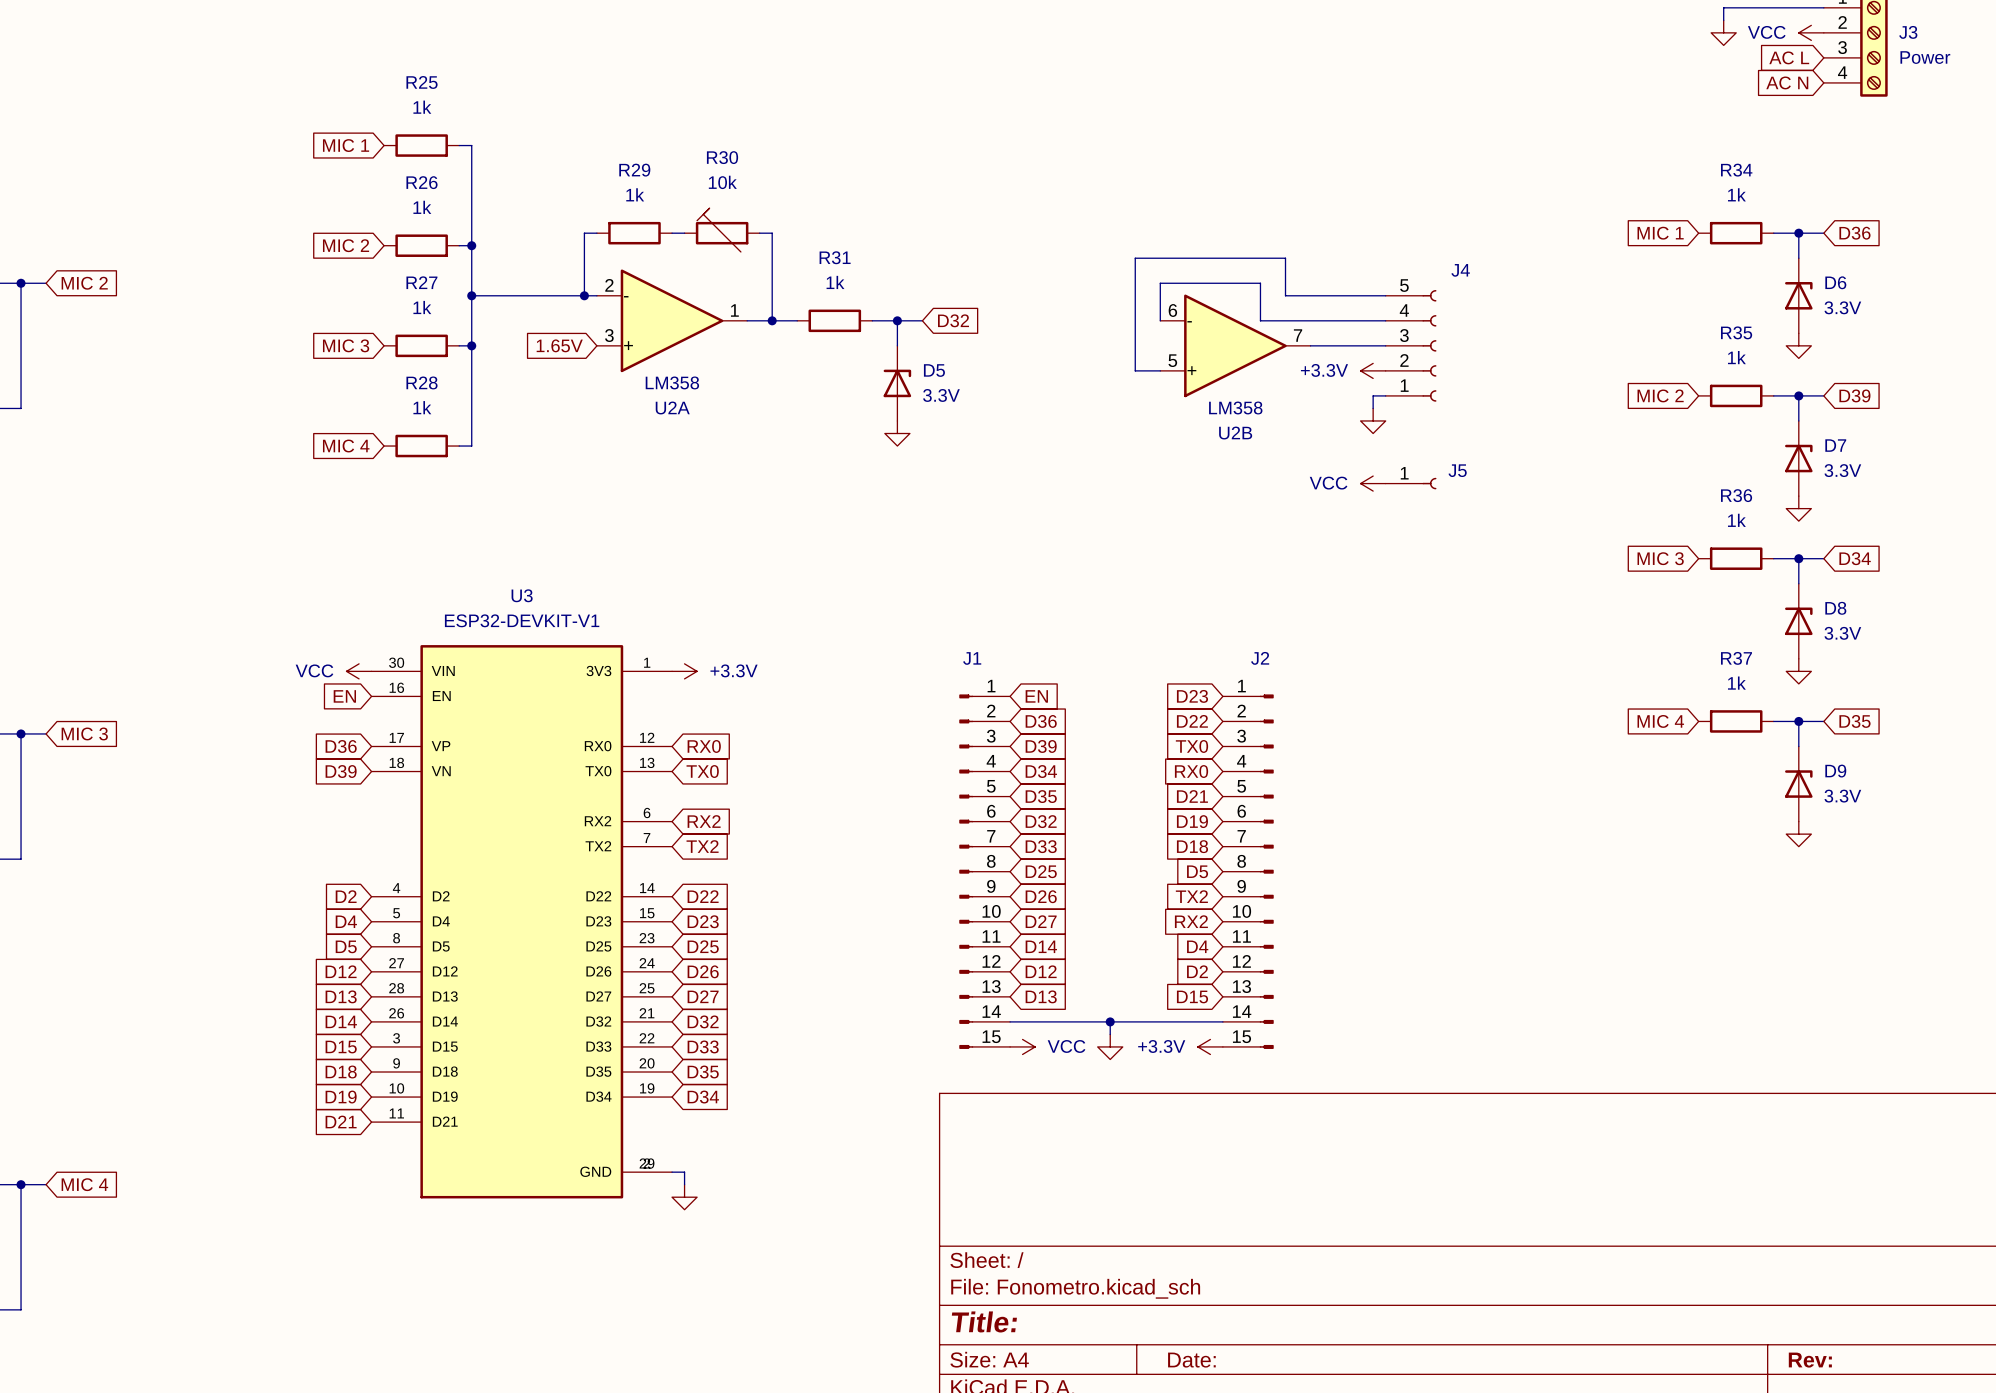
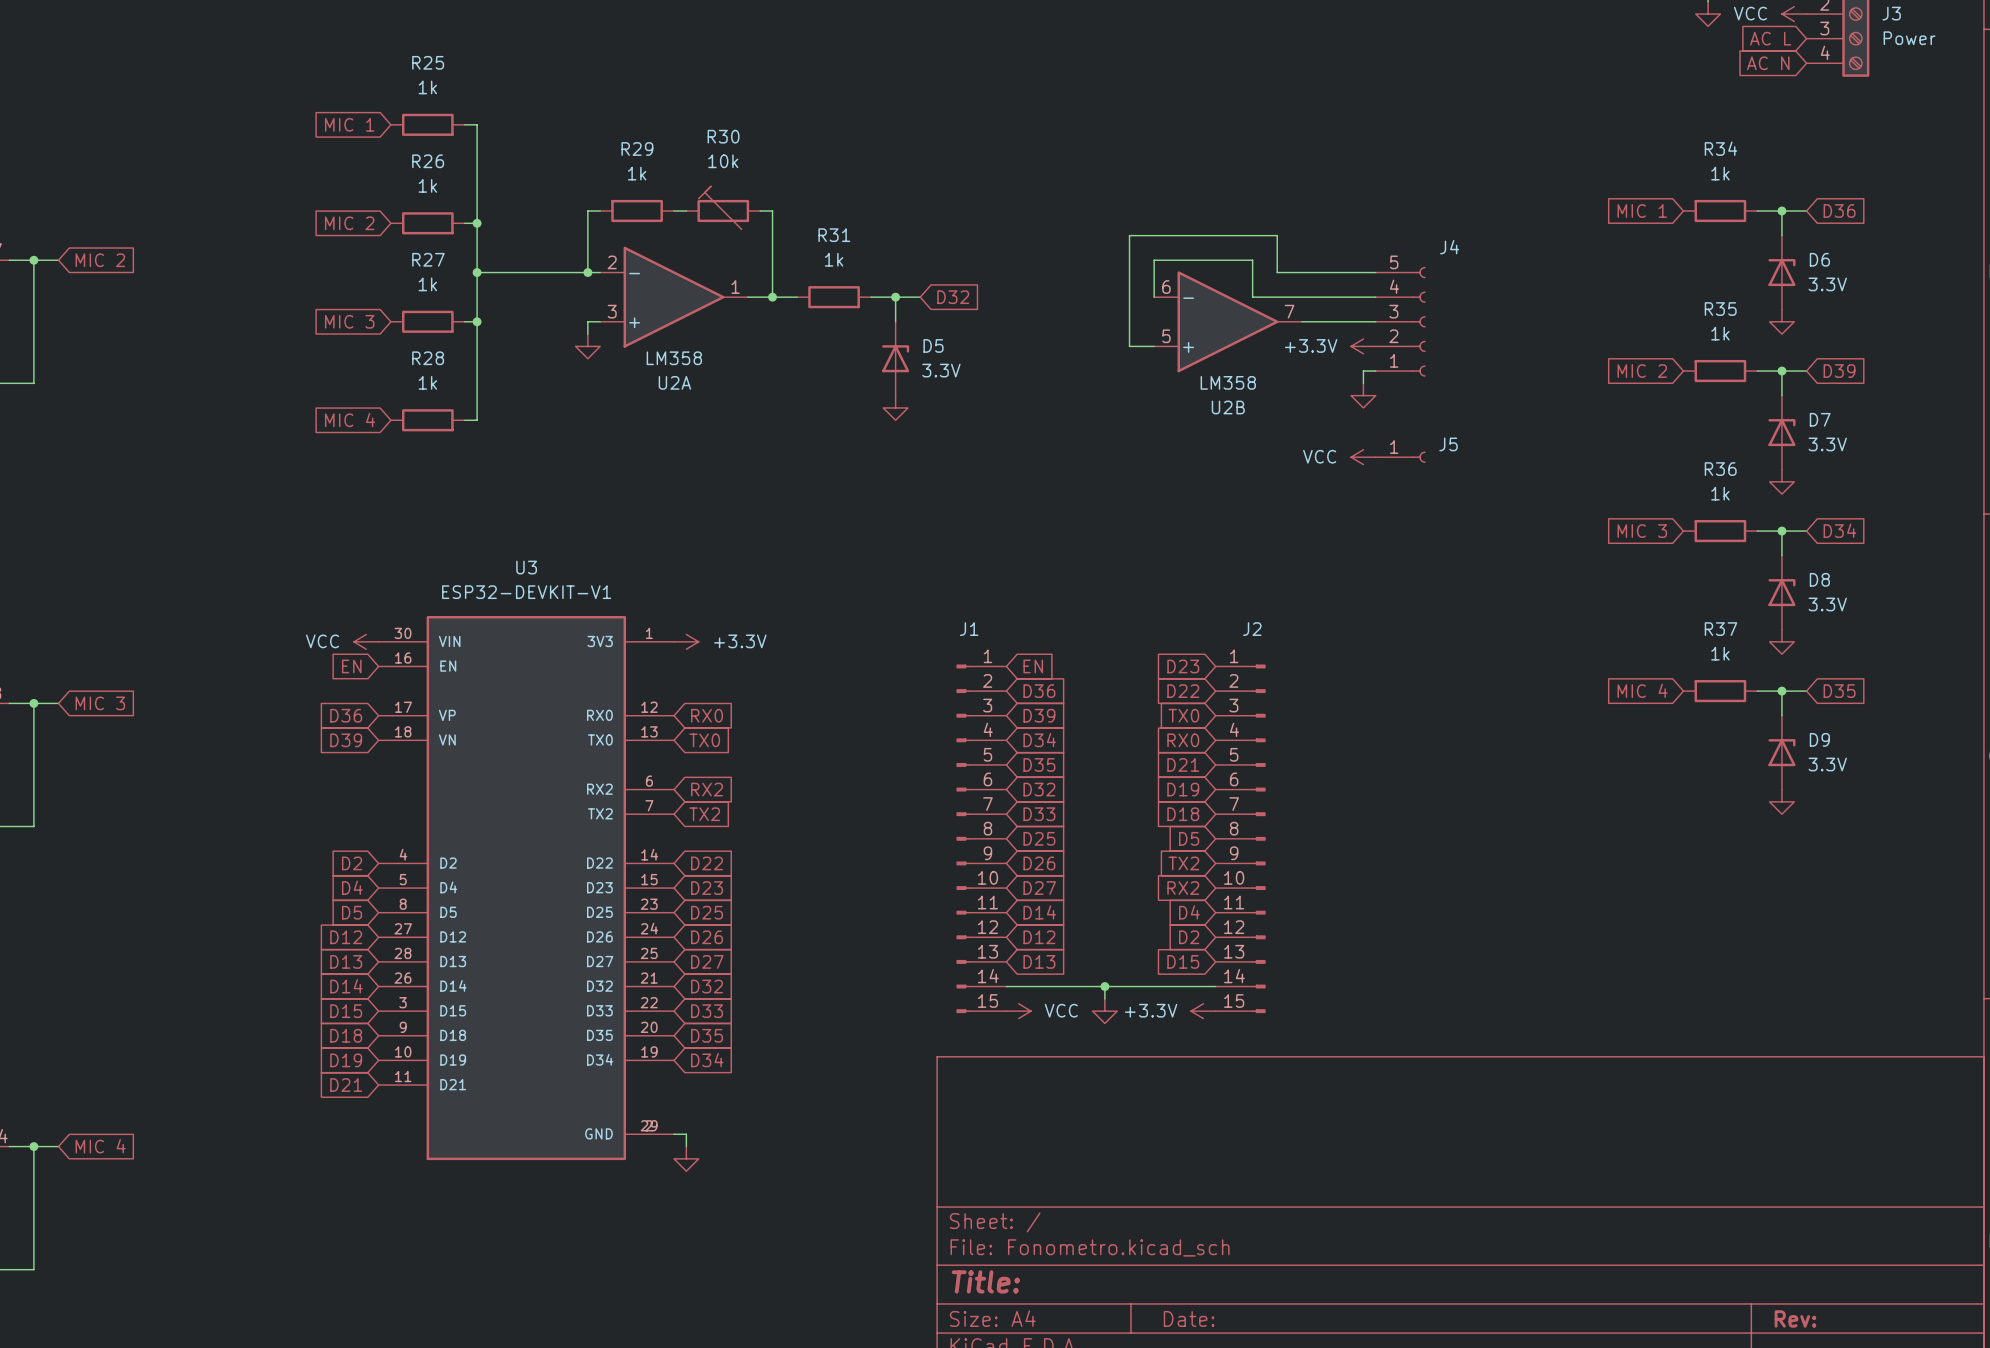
global label: 1.65V (559, 345) -> none
wire: none -> (600, 321) (587, 321) (587, 334)
power symbol: none -> (587, 346)

